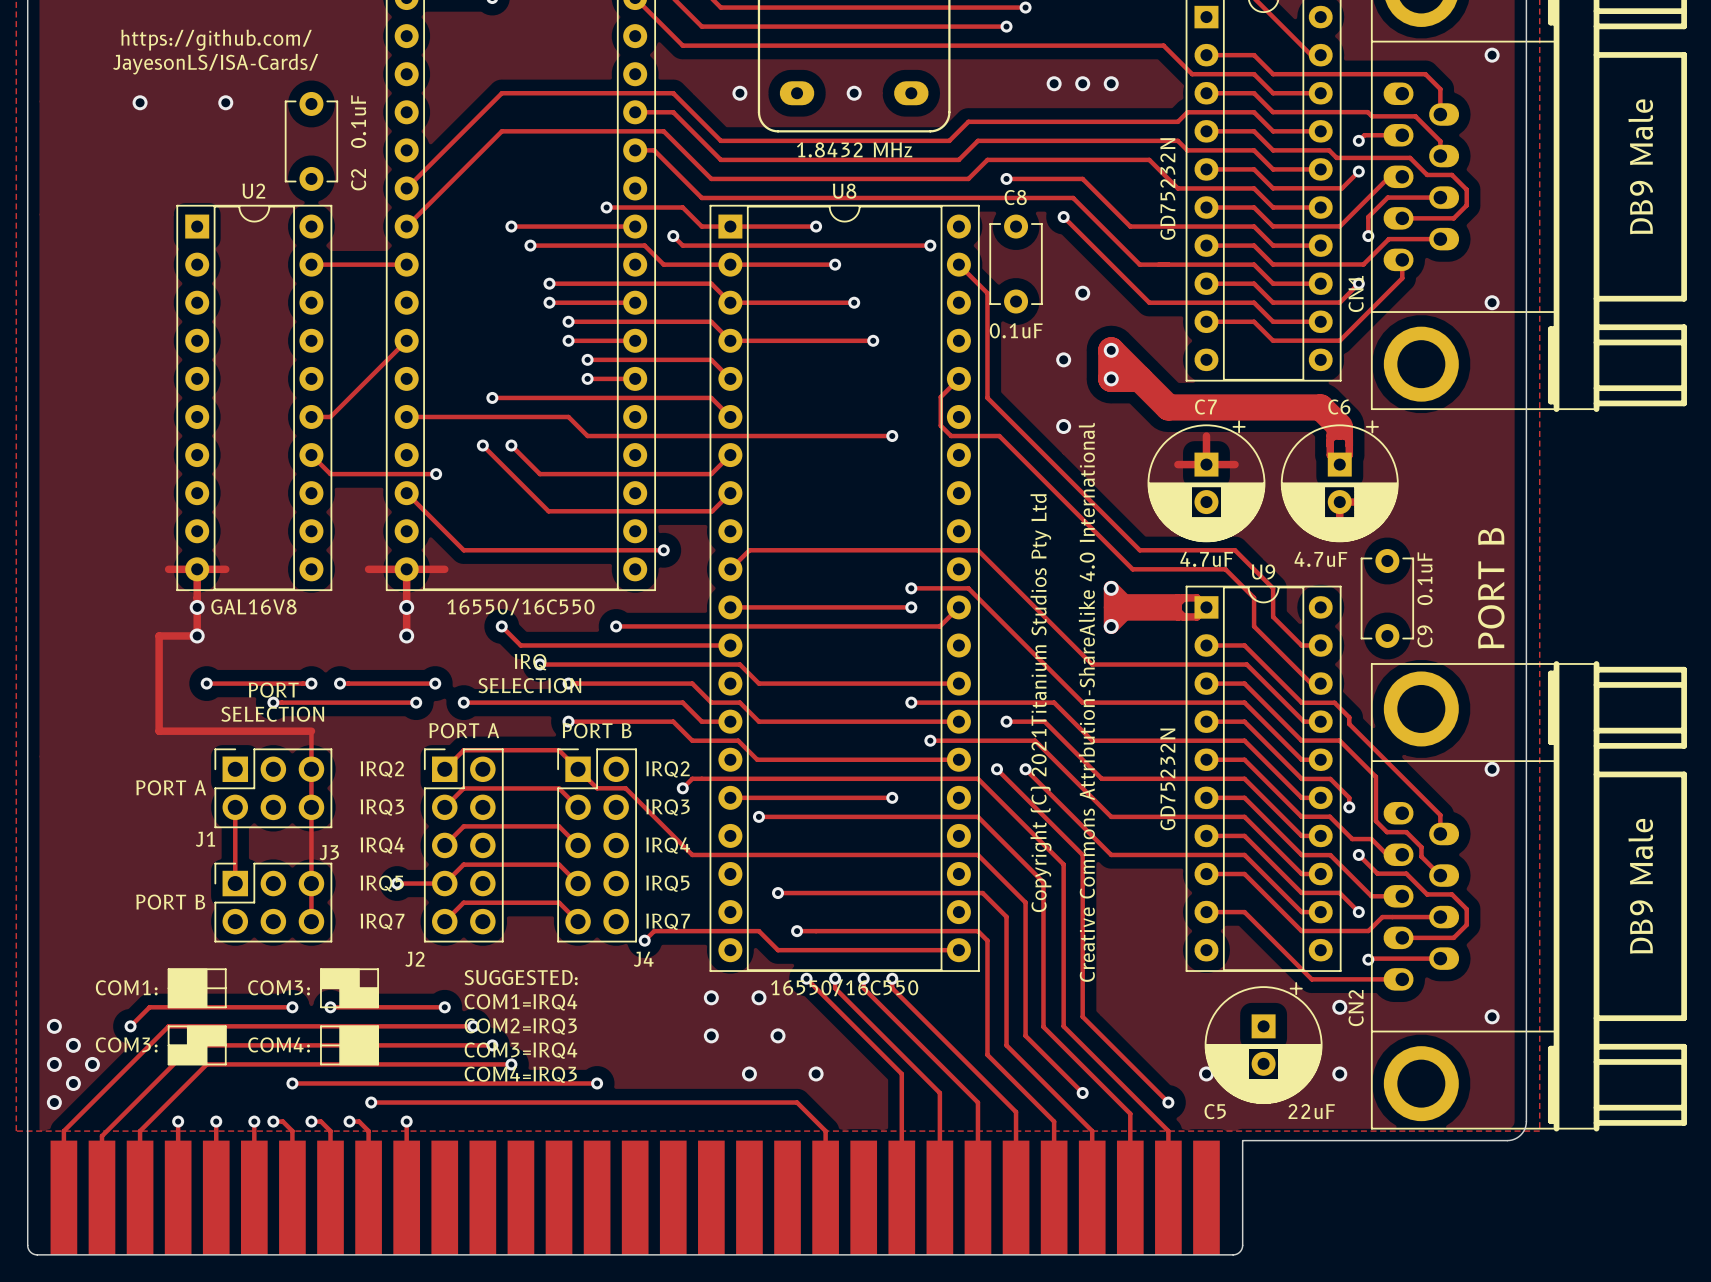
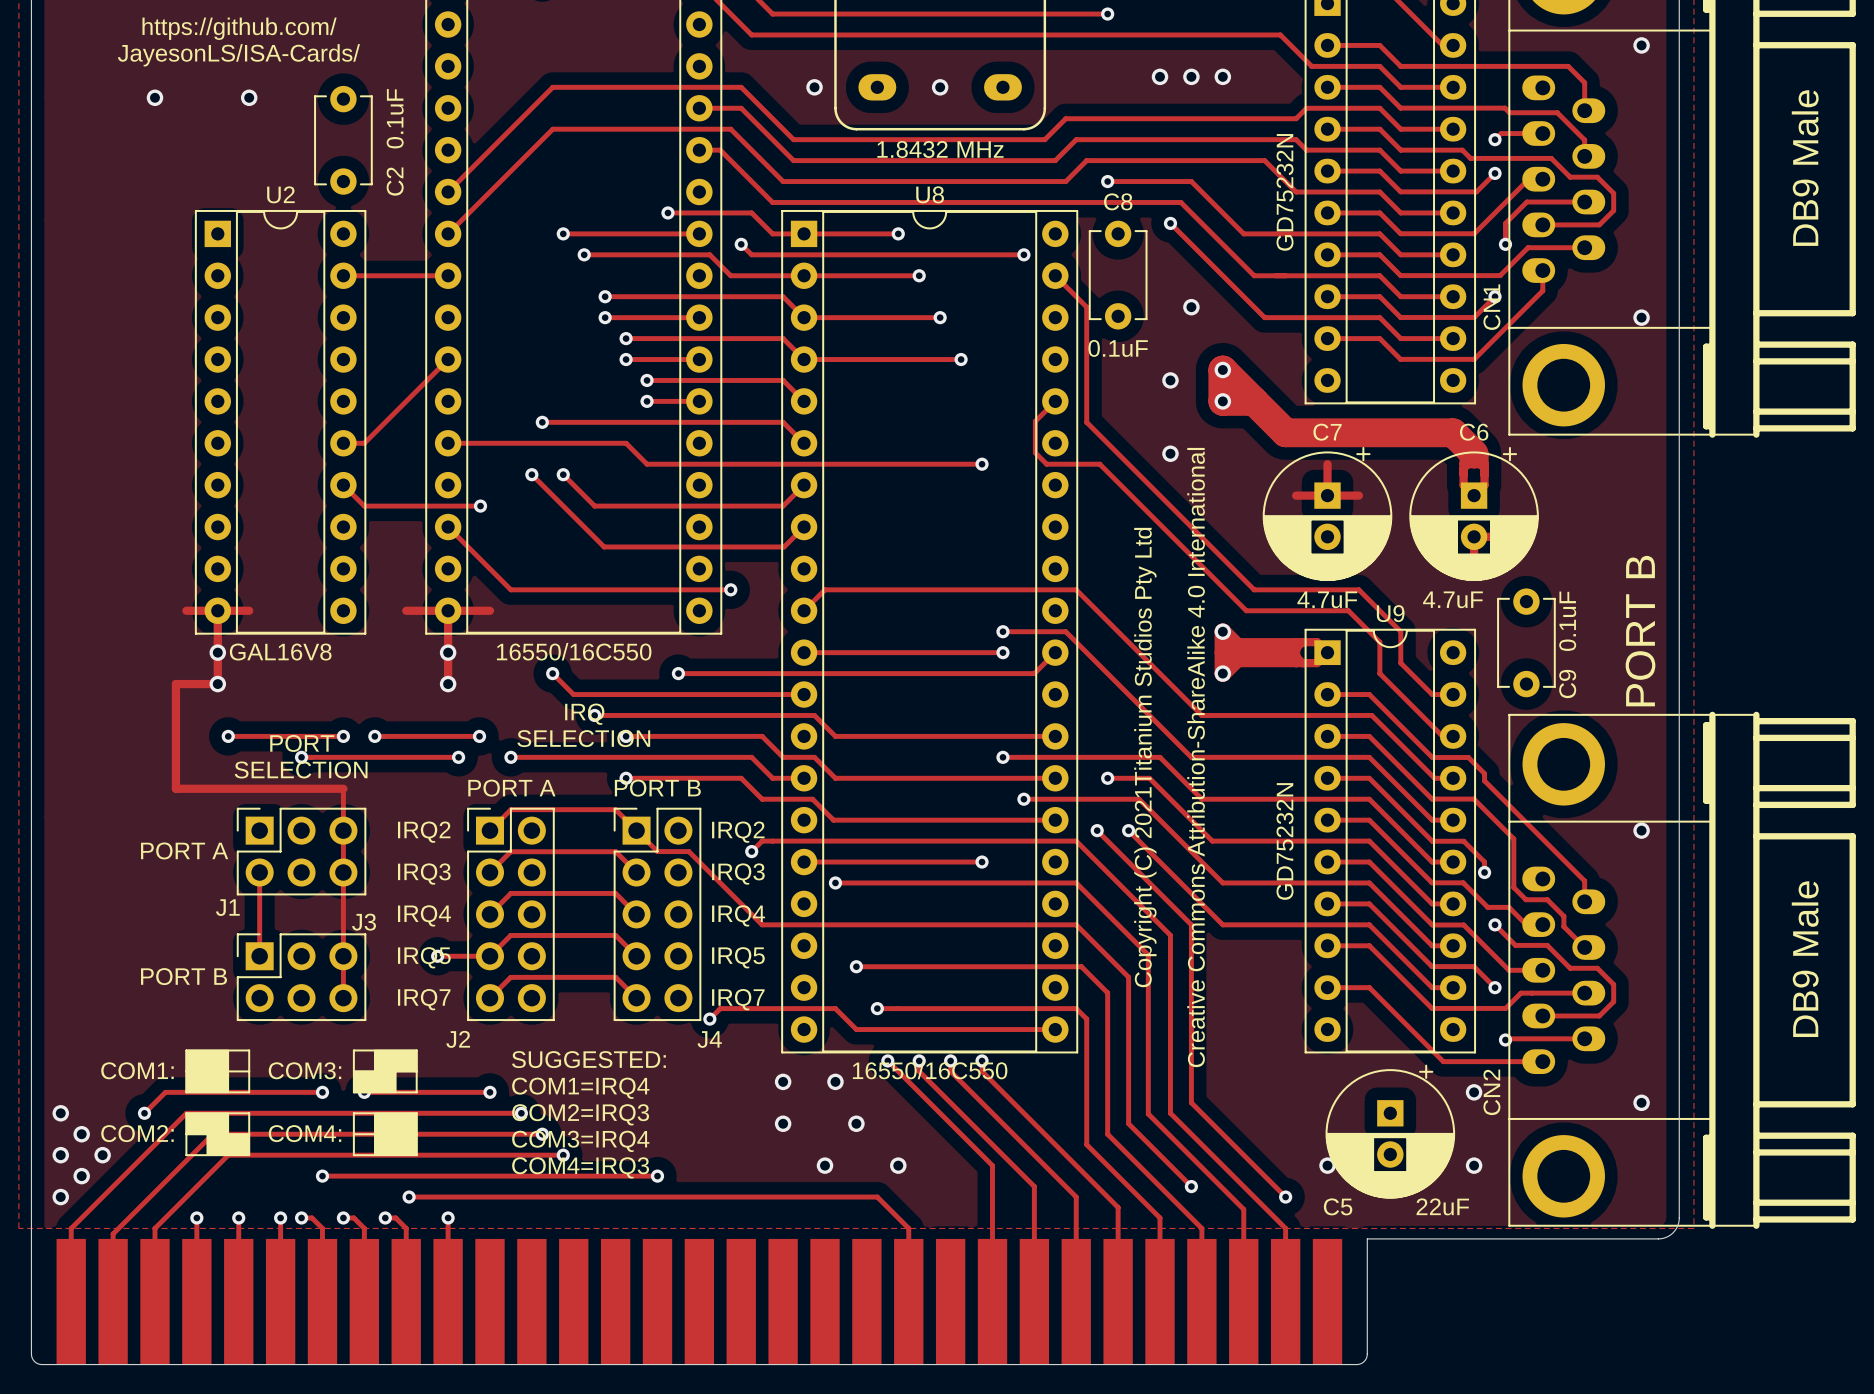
drawing: [320, 968, 379, 1009] -> none
drawing: none -> [353, 1049, 418, 1094]
drawing: [167, 1025, 227, 1066] -> none
drawing: none -> [185, 1112, 251, 1156]
text: COM3: (126, 1044) -> COM2: (137, 1133)

